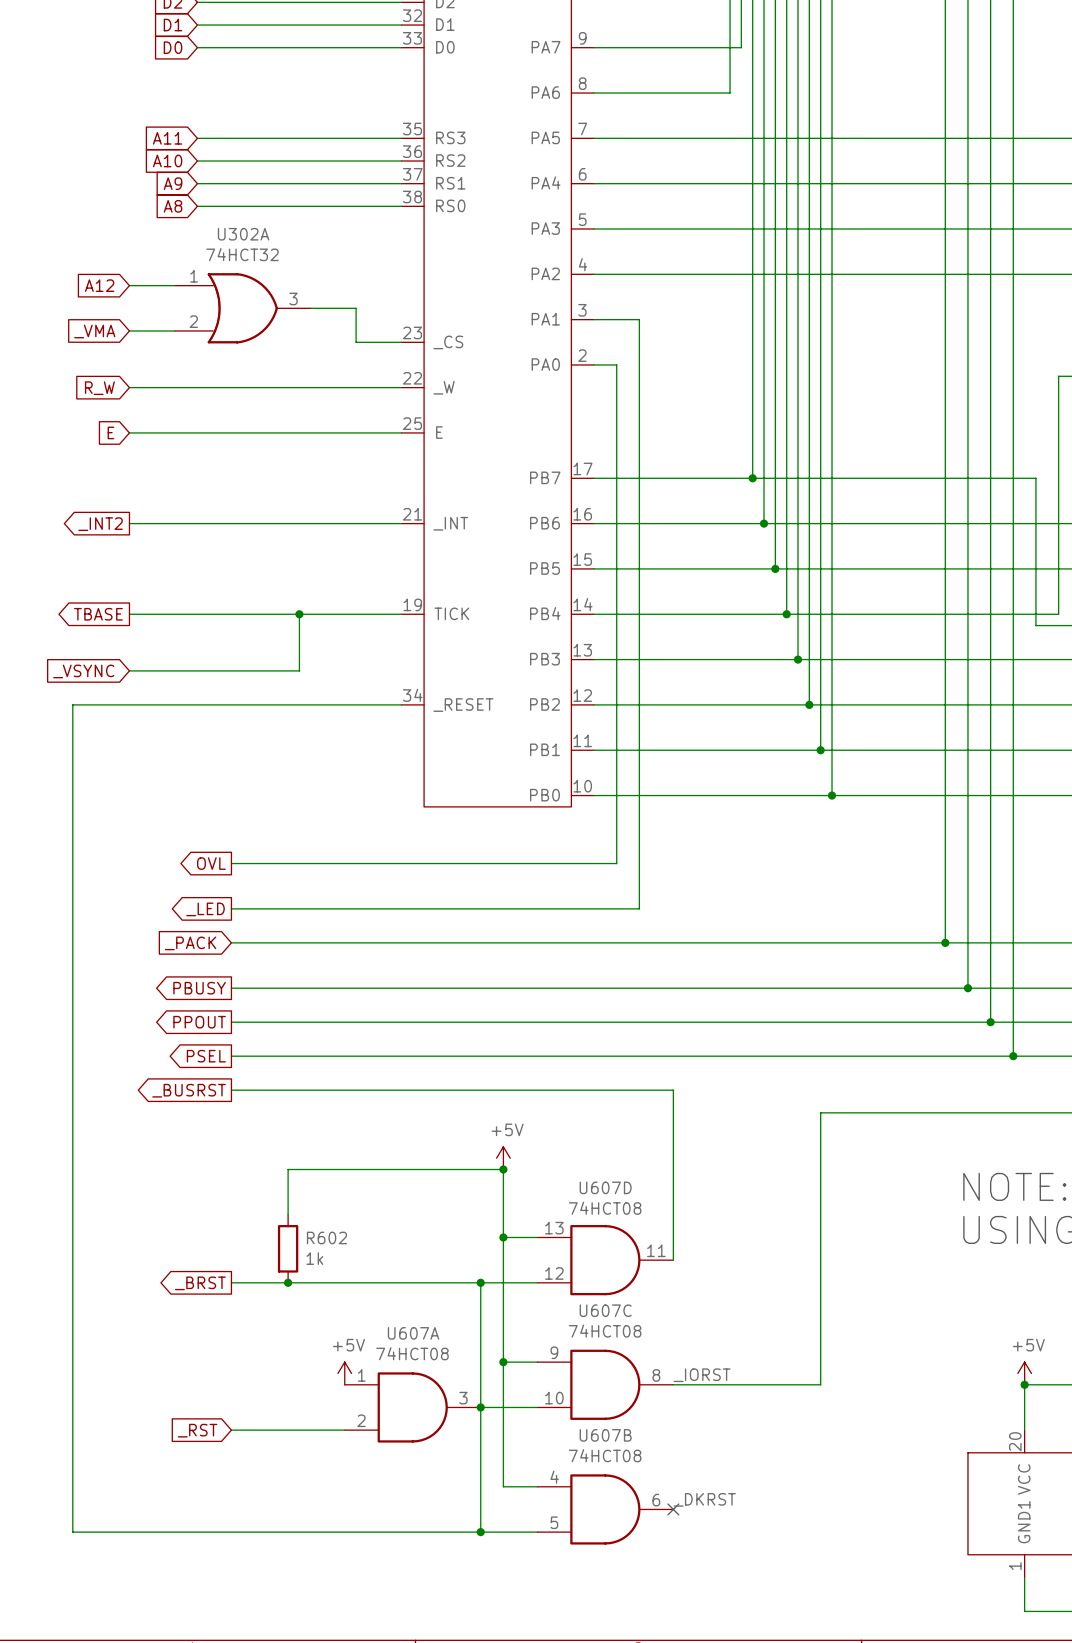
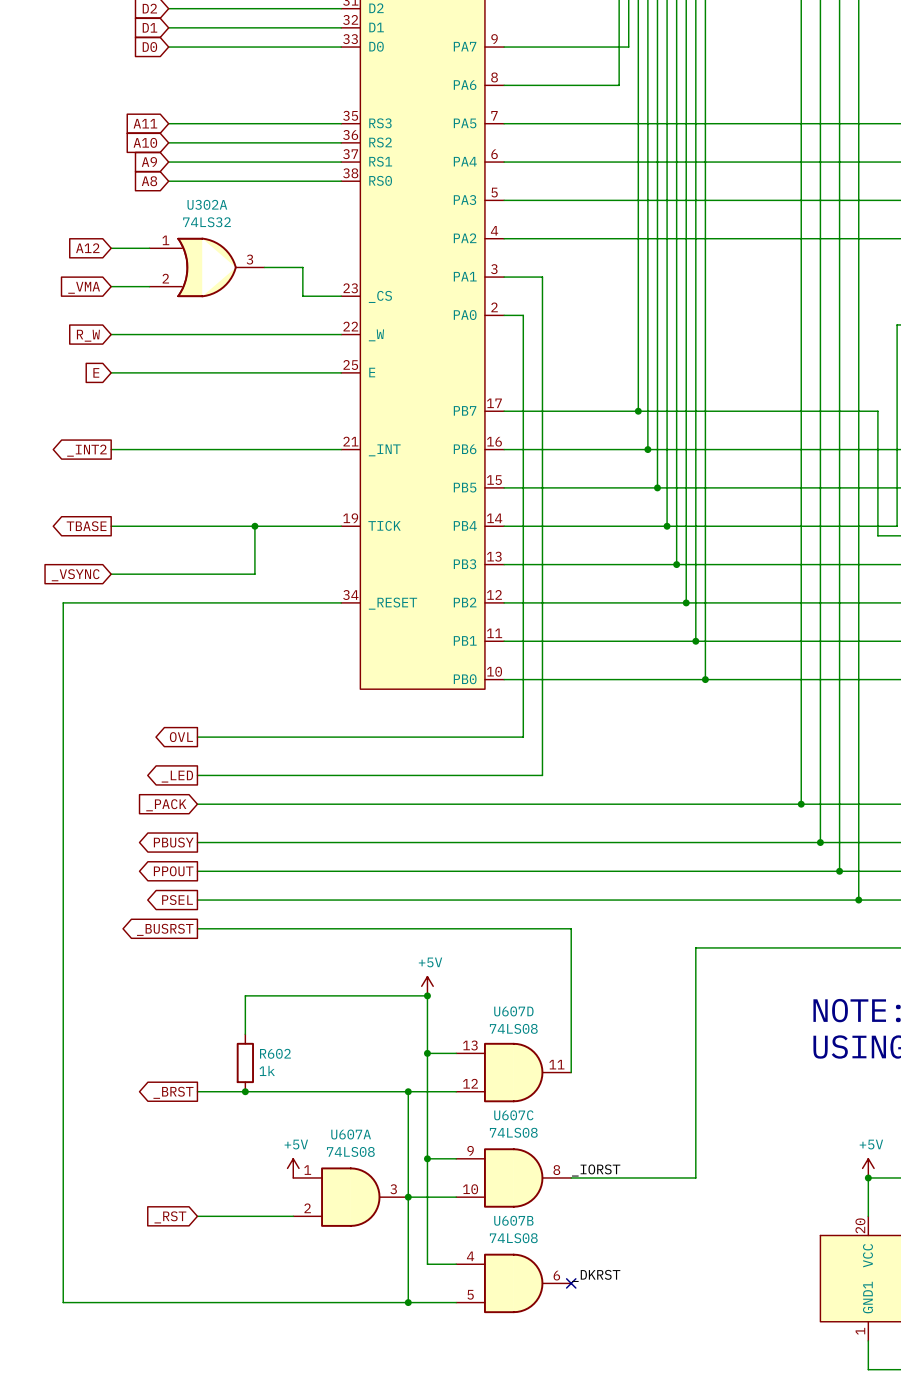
U302A value: 74HCT32 (242, 254) -> 74LS32 (207, 222)
U607D value: 74HCT08 (605, 1208) -> 74LS08 (513, 1028)
U607C value: 74HCT08 (605, 1331) -> 74LS08 (513, 1132)
U607A value: 74HCT08 (412, 1353) -> 74LS08 (350, 1151)
U607B value: 74HCT08 (605, 1455) -> 74LS08 (513, 1238)

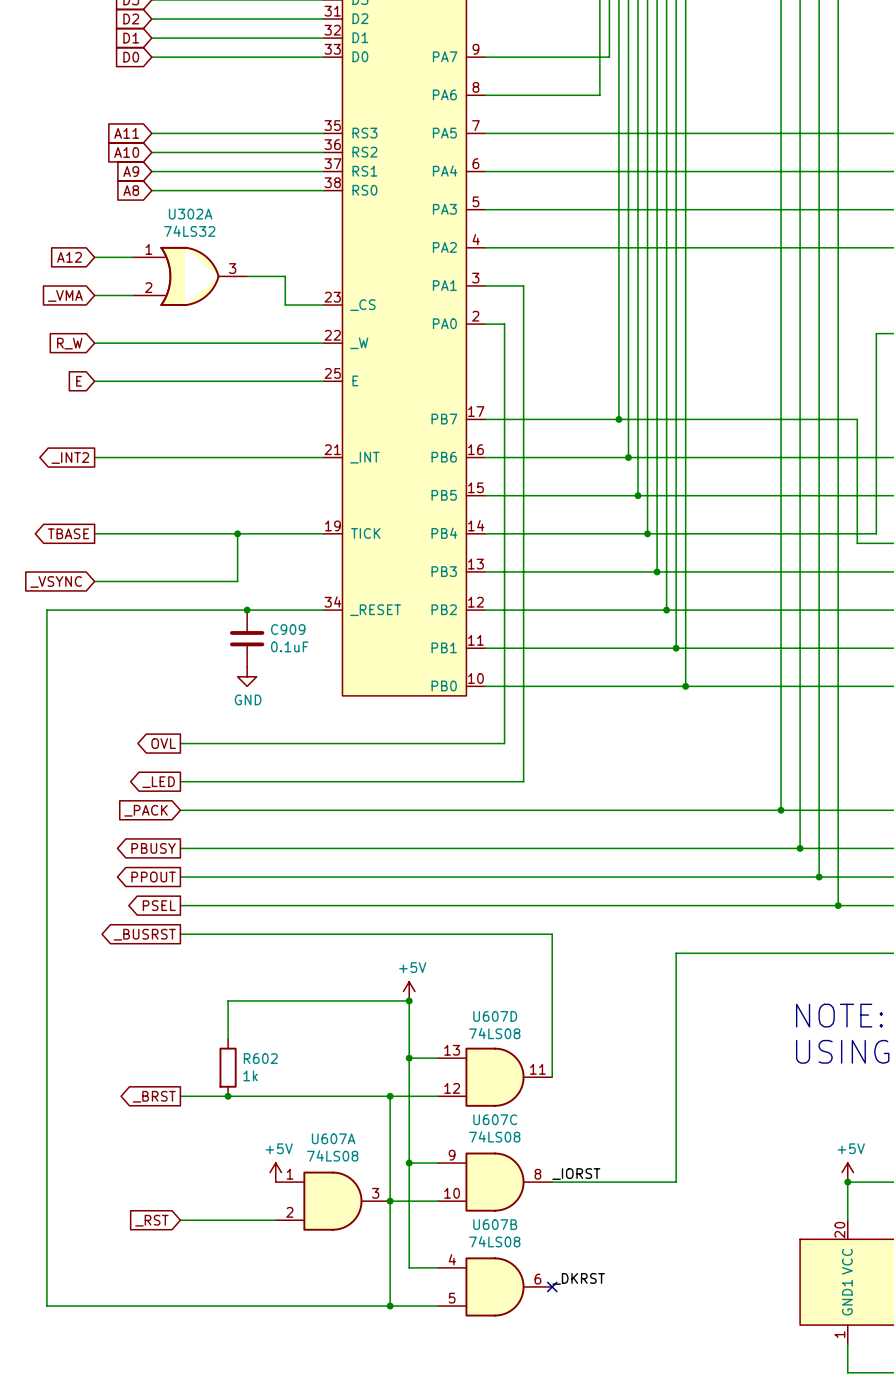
junction: none -> (247, 610)
C909: none -> 0.1uF (247, 638)
power symbol: none -> GND (247, 676)

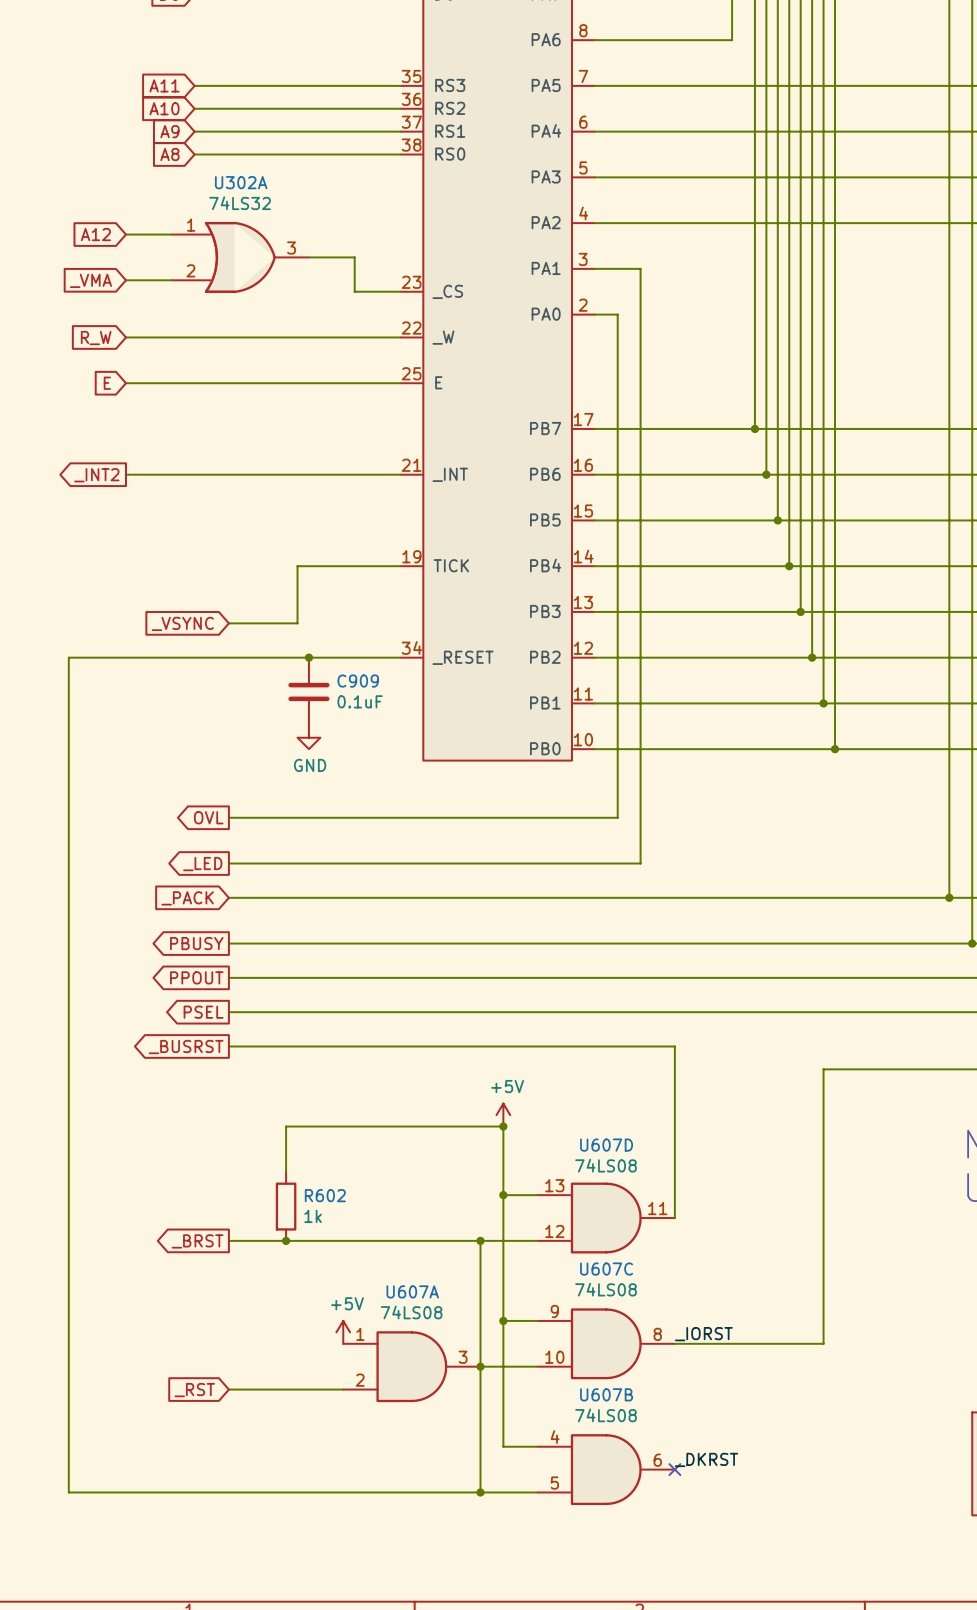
global label: TBASE (68, 533) -> none
wire: (94, 533) (237, 533) -> none
junction: (237, 533) -> none
global label position: _VSYNC (56, 581) -> _VSYNC (182, 623)
wire: (94, 581) (180, 581) -> none

